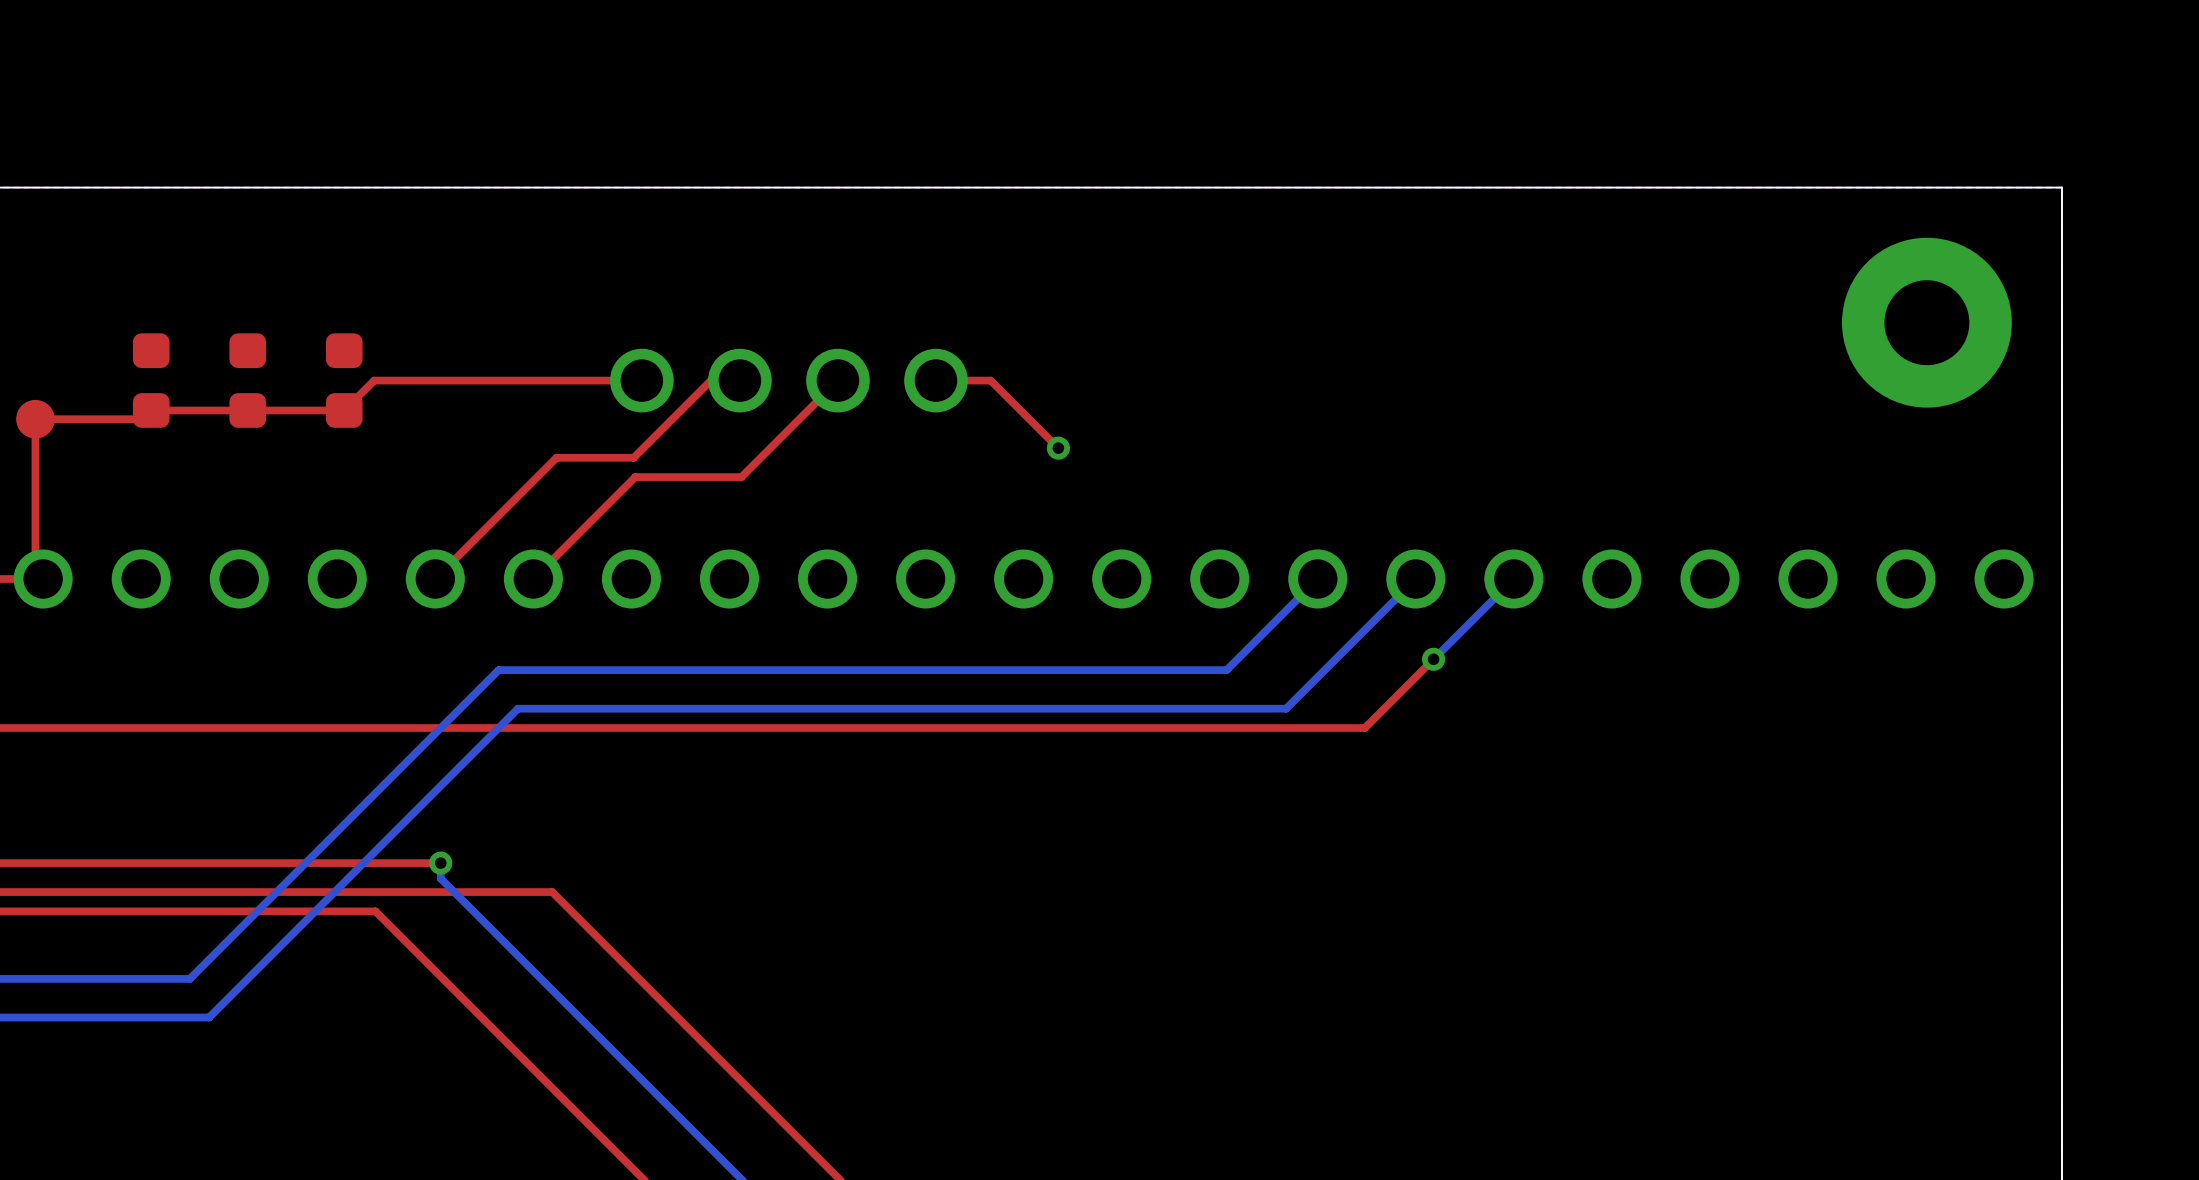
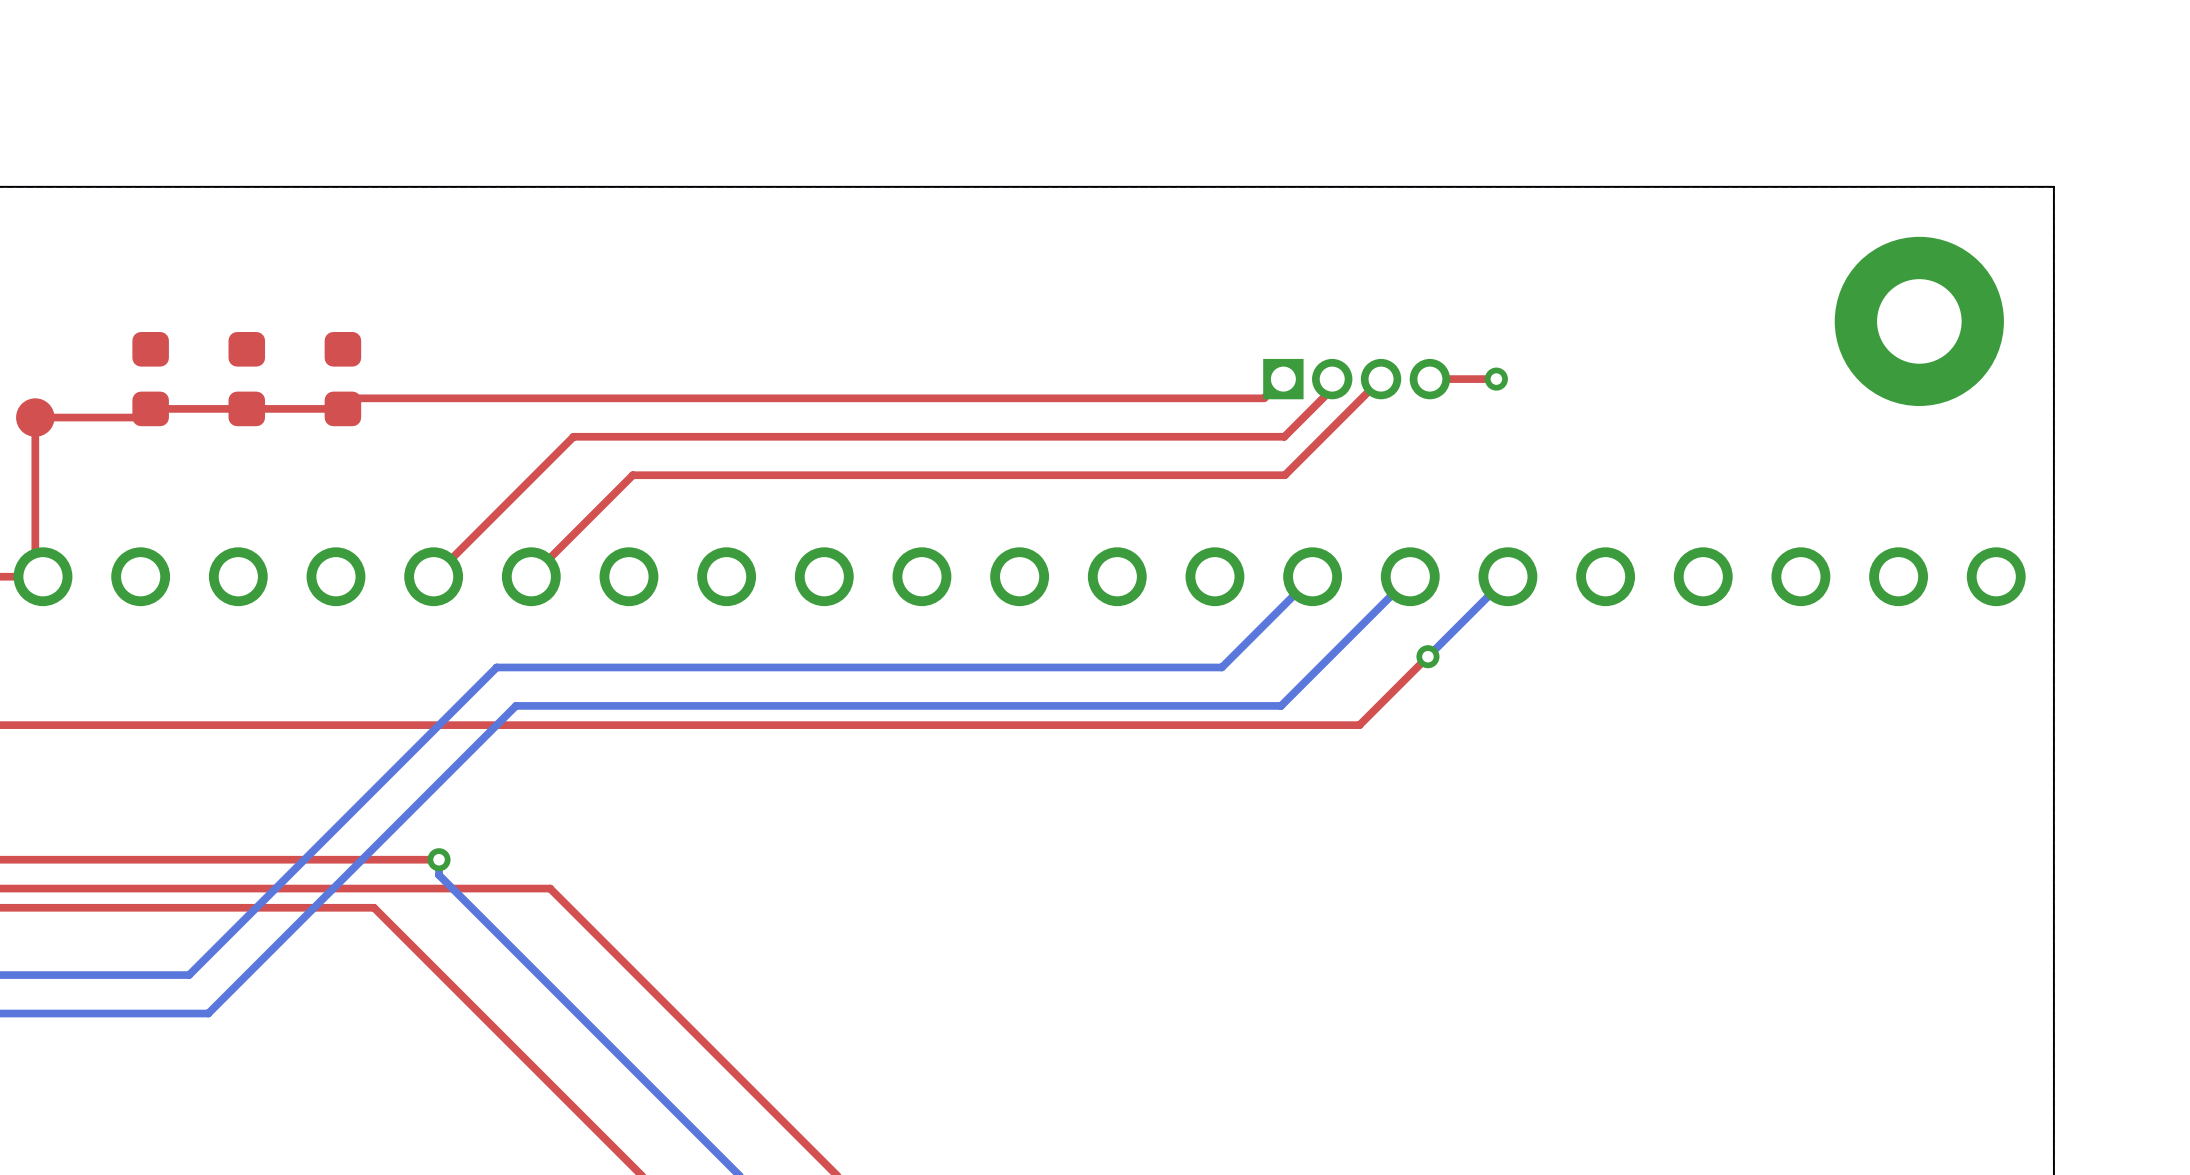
top track: (641, 380) (374, 380) (354, 399) -> (1283, 379) (1264, 398) (353, 398)
top track: (739, 380) (710, 380) (633, 457) (556, 457) -> (1332, 379) (1332, 388) (1284, 436) (573, 436) (554, 456)
part: (788, 380) -> none
top track: (837, 380) (741, 477) -> (1381, 379) (1284, 475) (738, 475)
top track: (936, 380) (990, 380) (1058, 448) -> none
part: none -> (1356, 379)
top track: none -> (1496, 379) (1429, 379)
via: none -> (1496, 379)
via: (1058, 448) -> none

